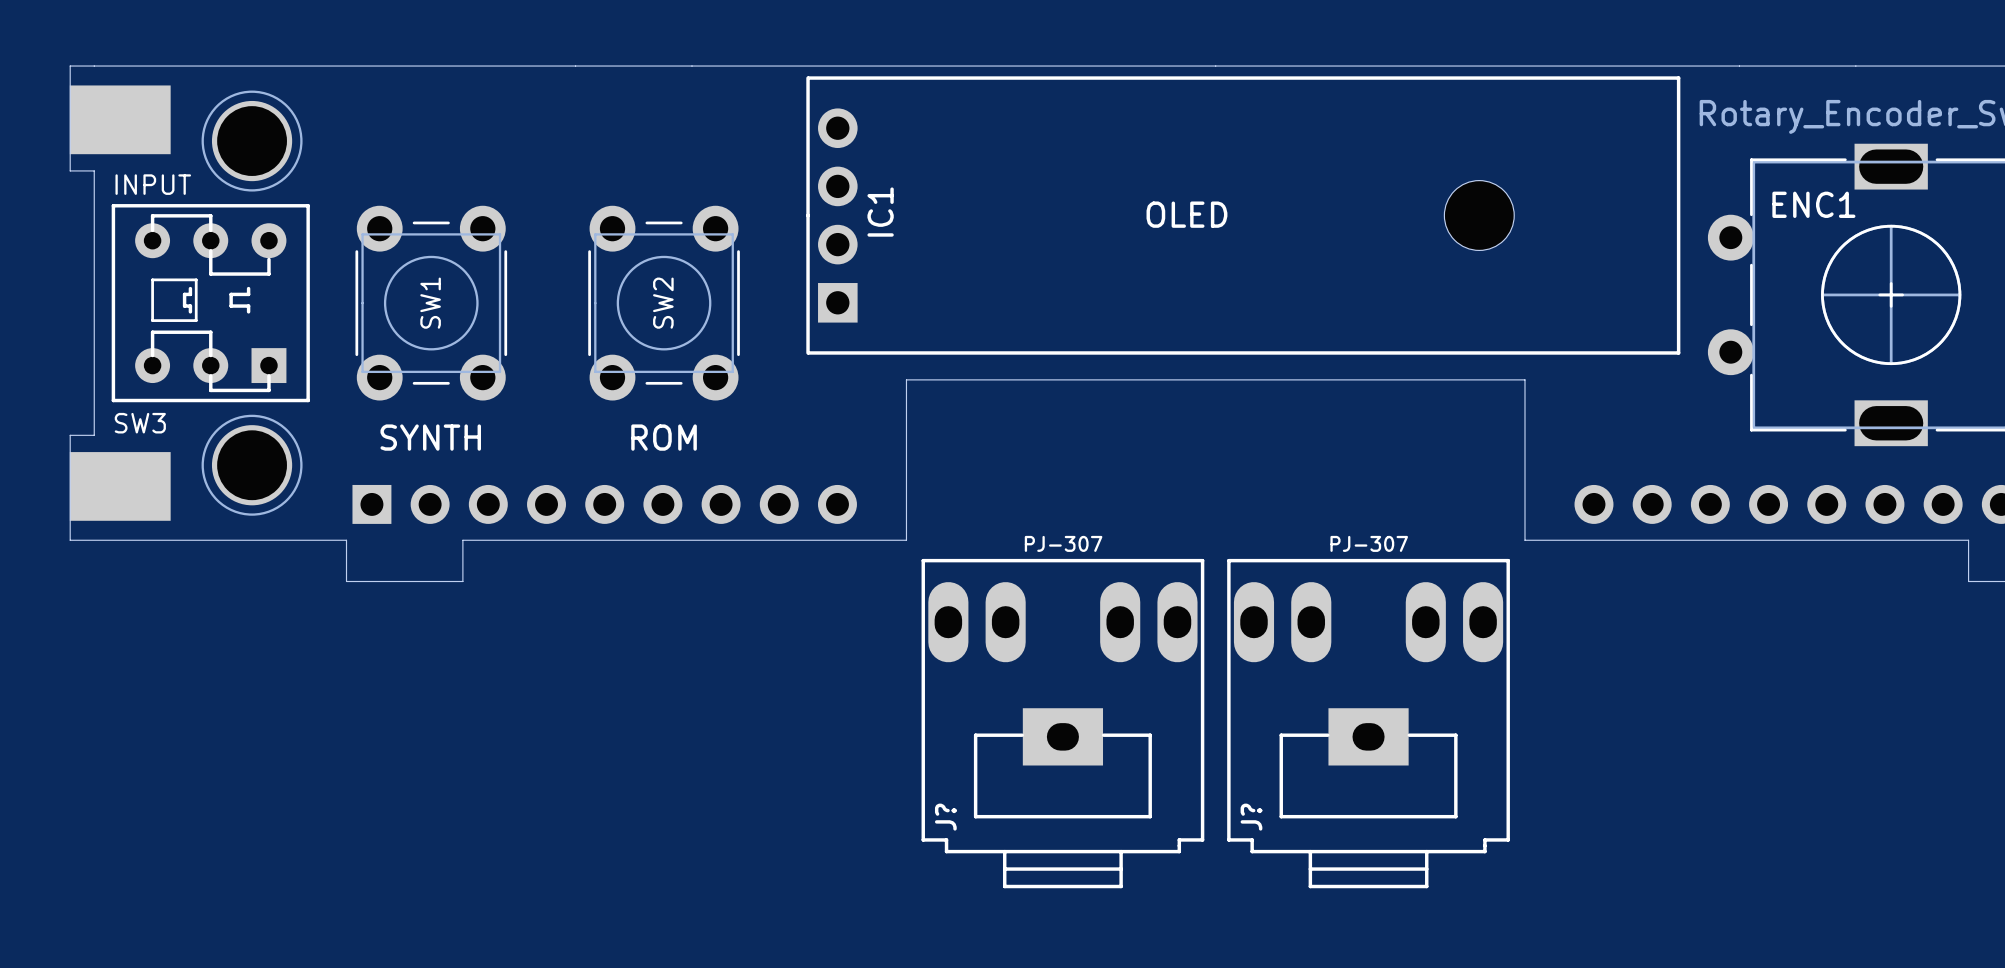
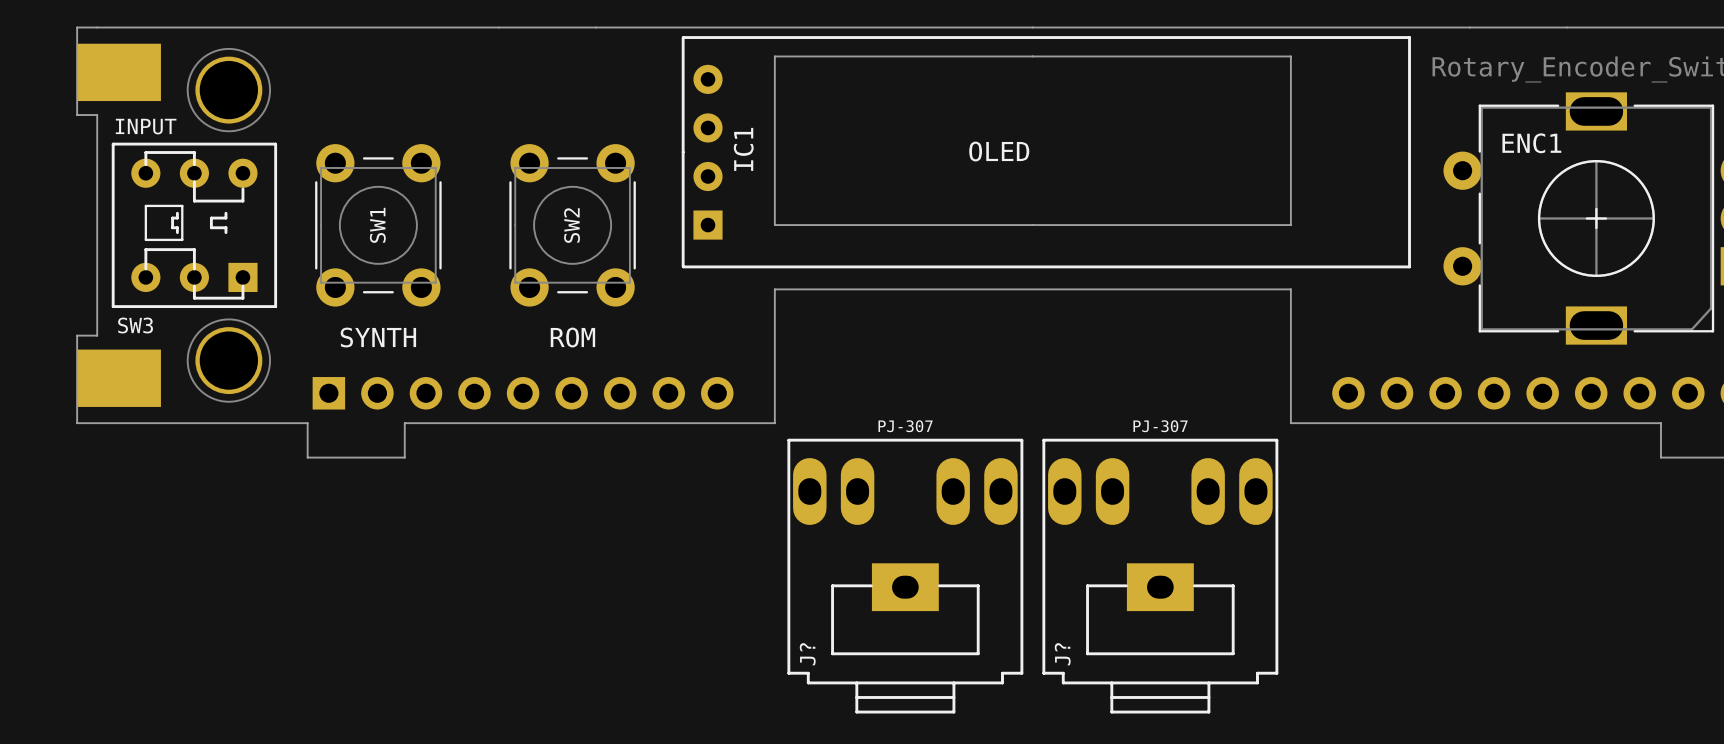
IC1 footprint: [806, 76, 1681, 355] -> [681, 36, 1411, 269]
board edge: none -> (774, 56) (1290, 56) (1290, 225) (774, 225) (774, 56)

